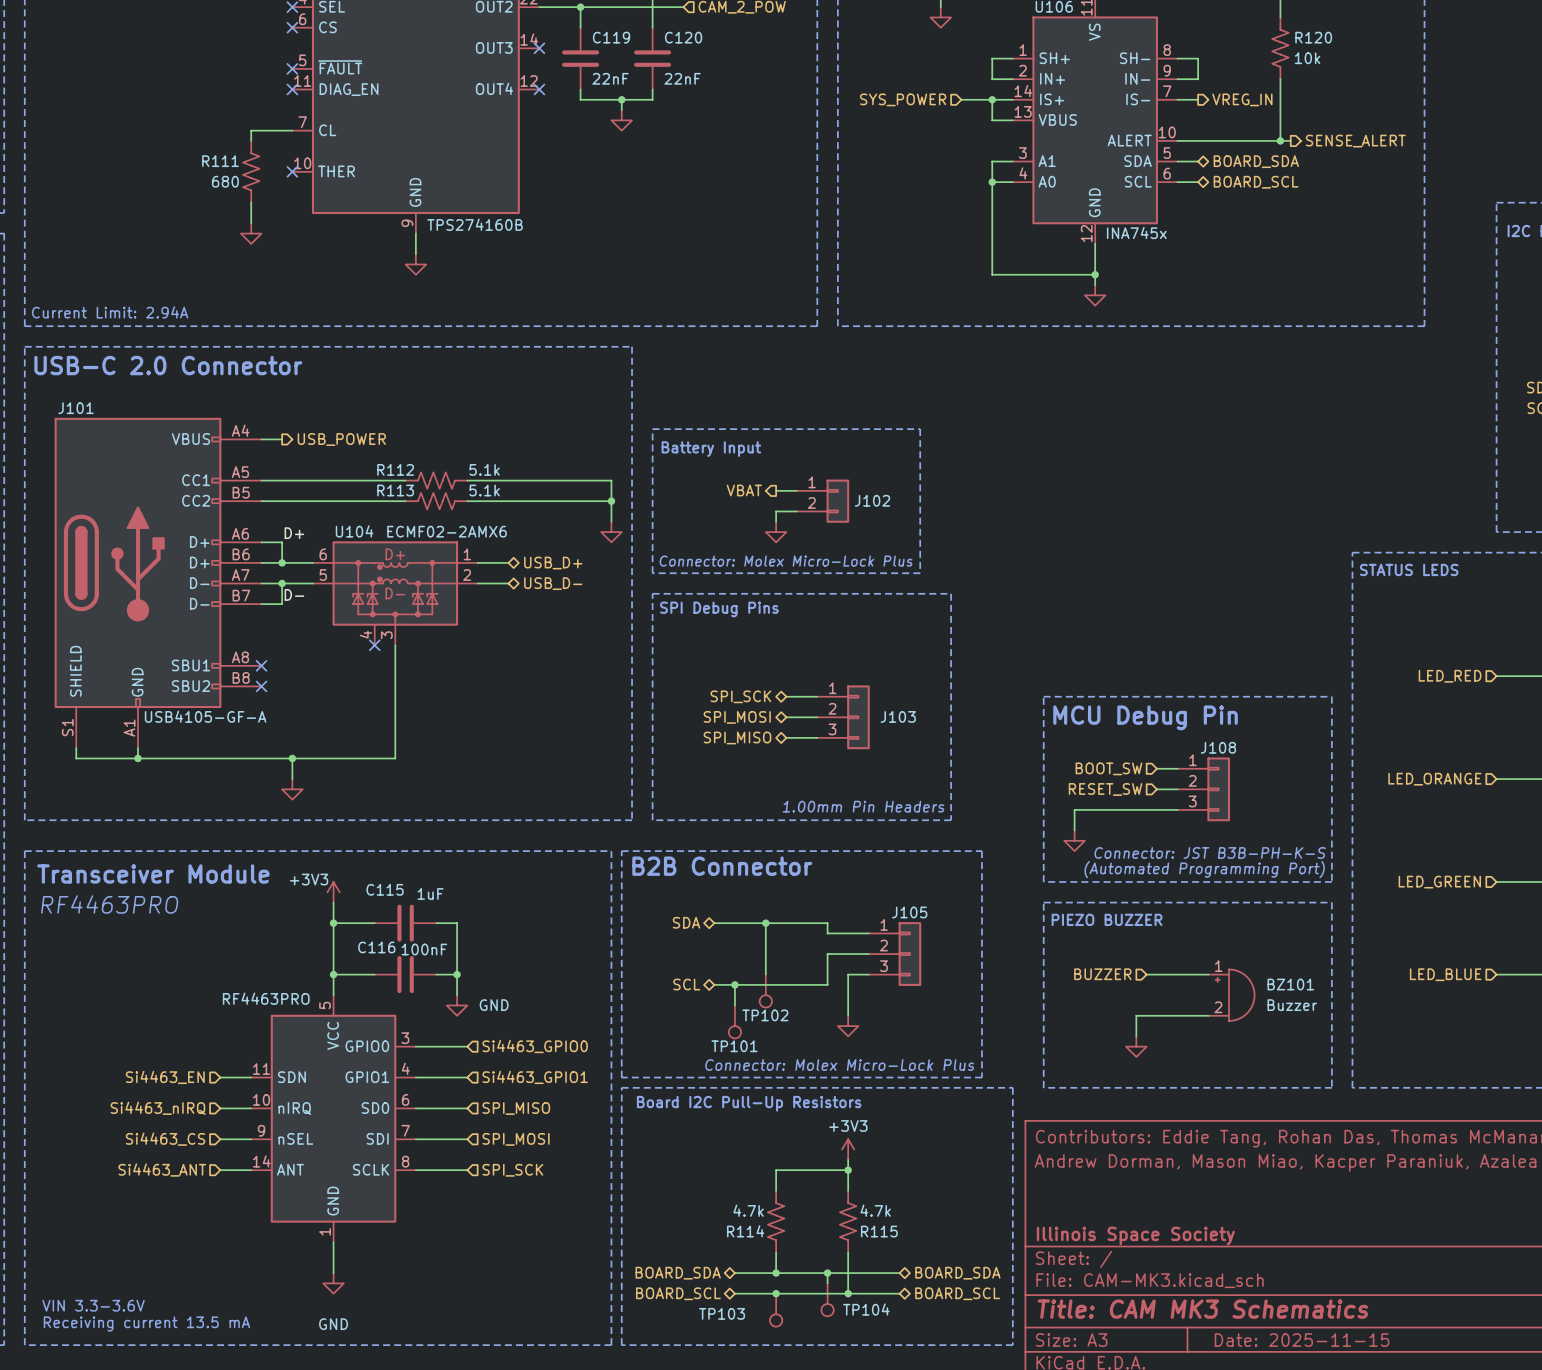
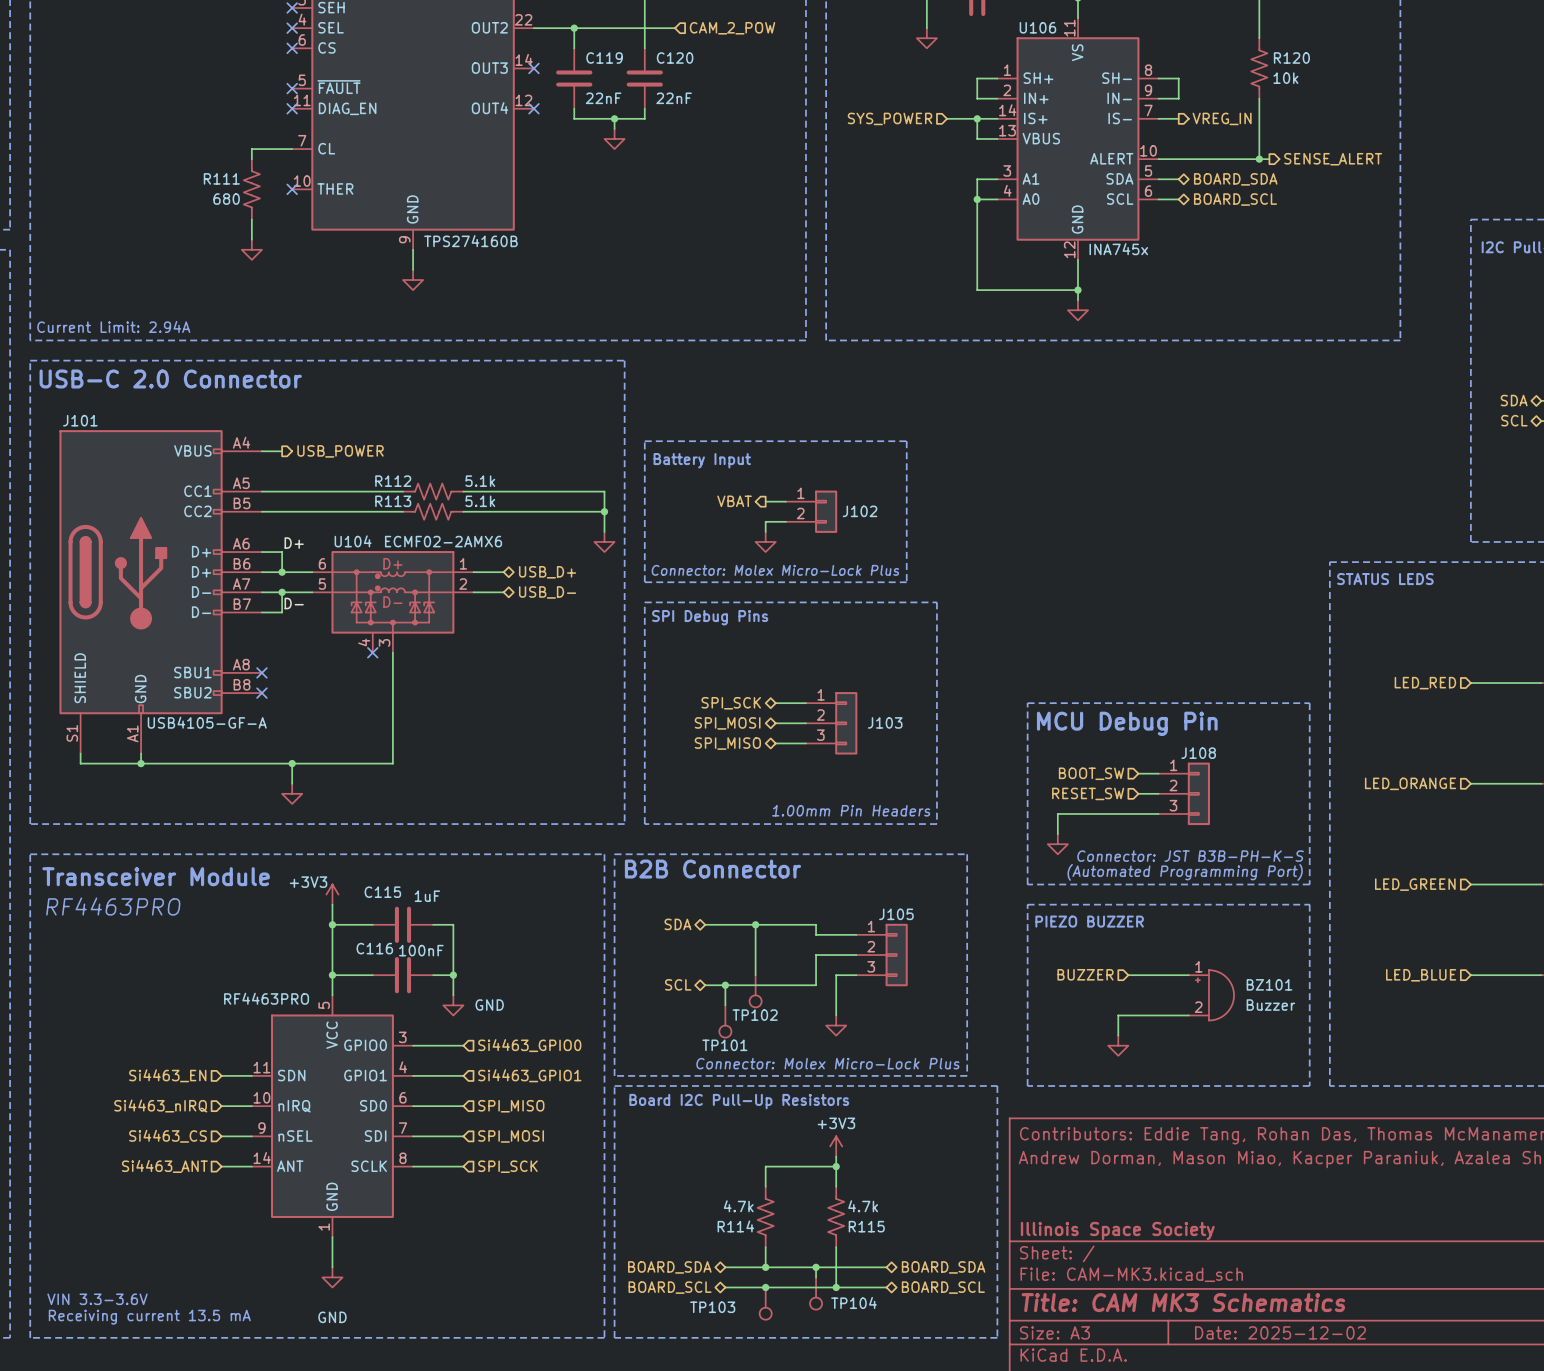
title block: Date: 2025-11-15 (1302, 1340) -> Date: 2025-12-02 (1280, 1332)

